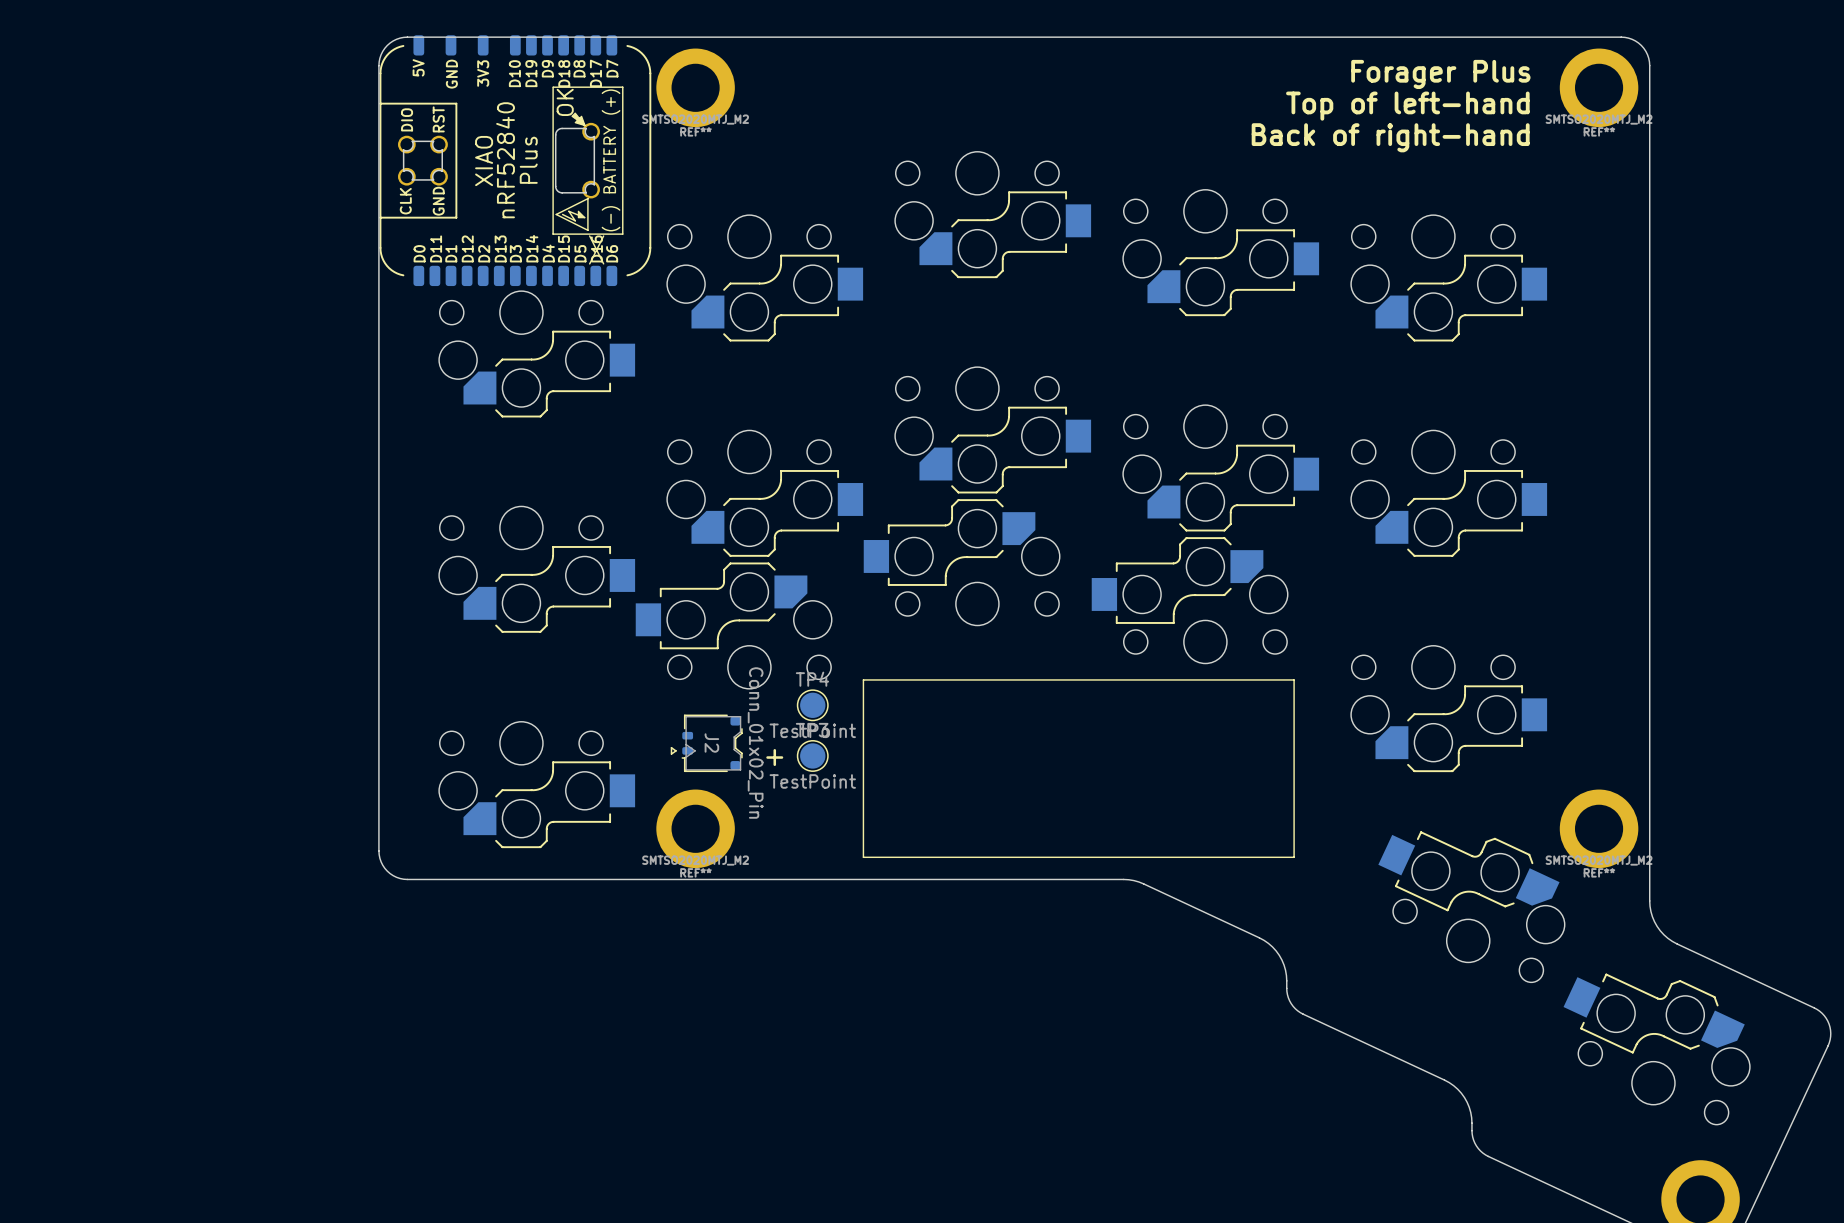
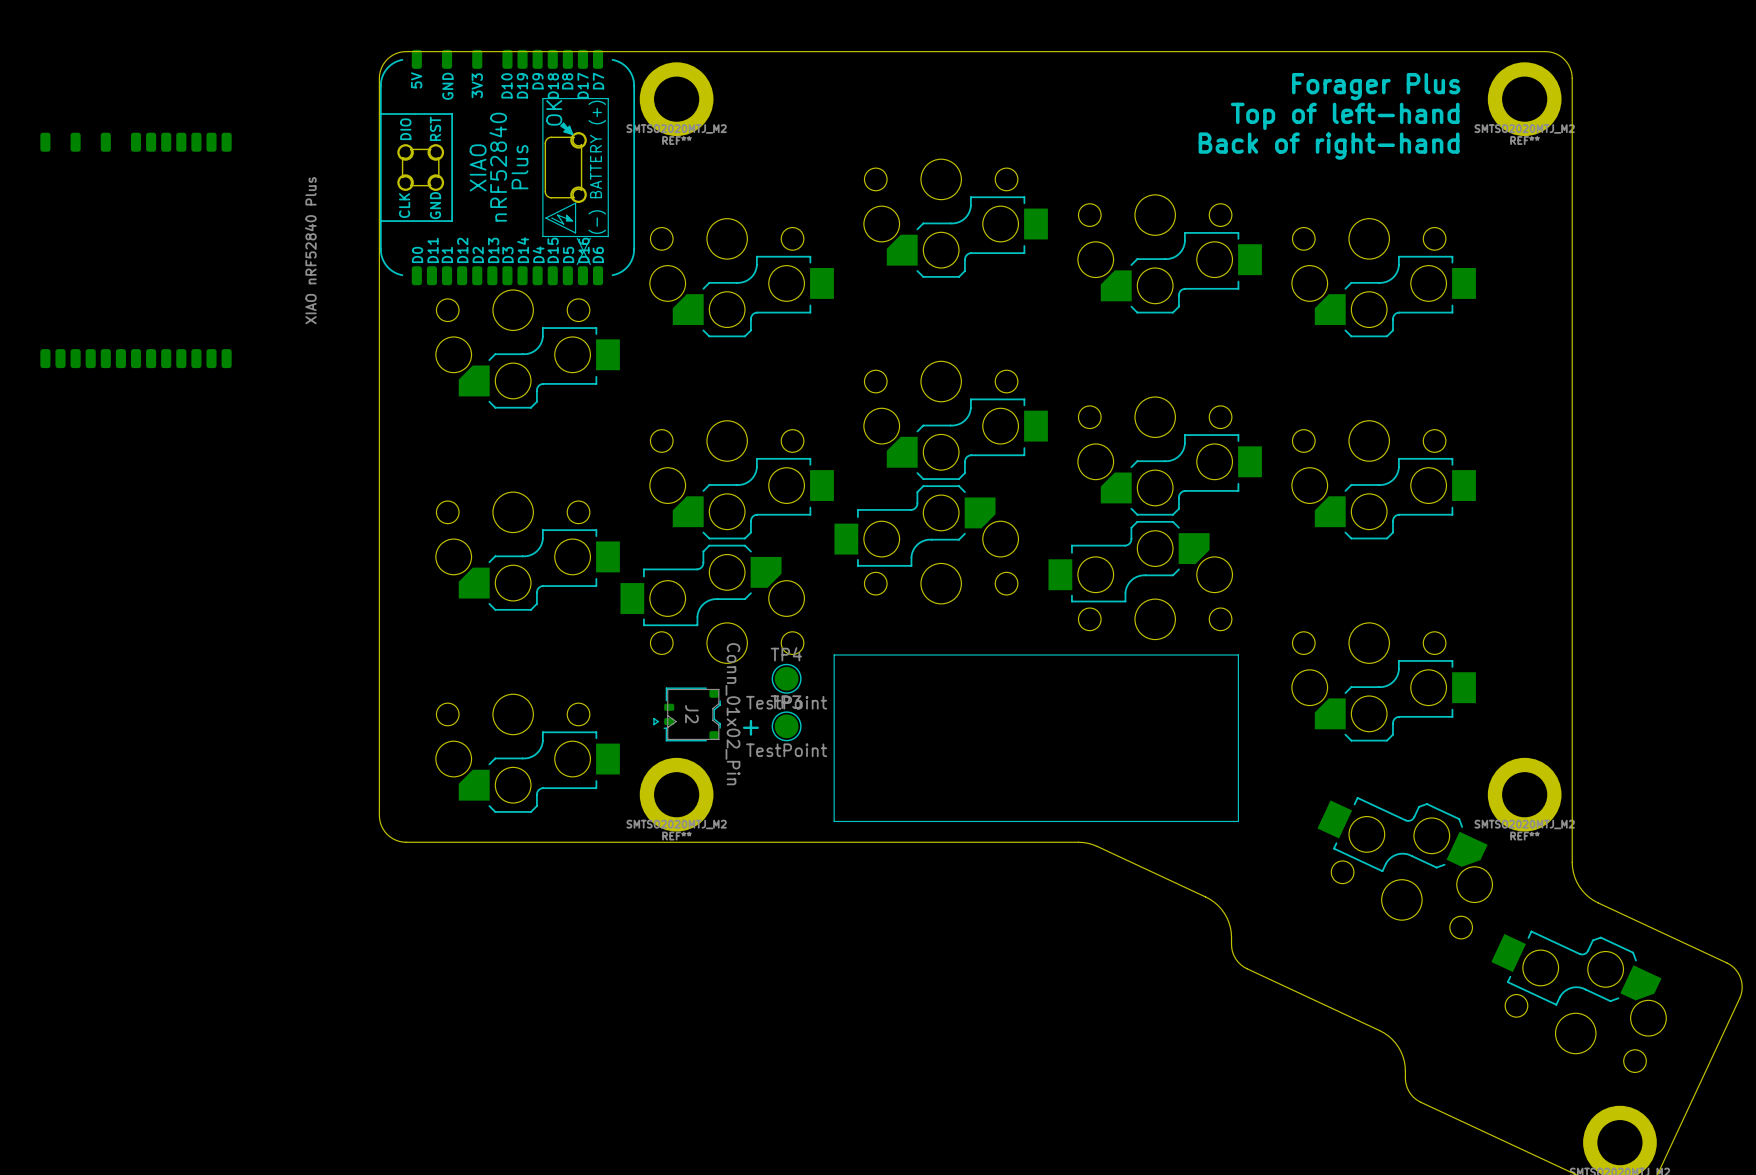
part: none -> XIAO nRF52840 Plus (136, 250)

